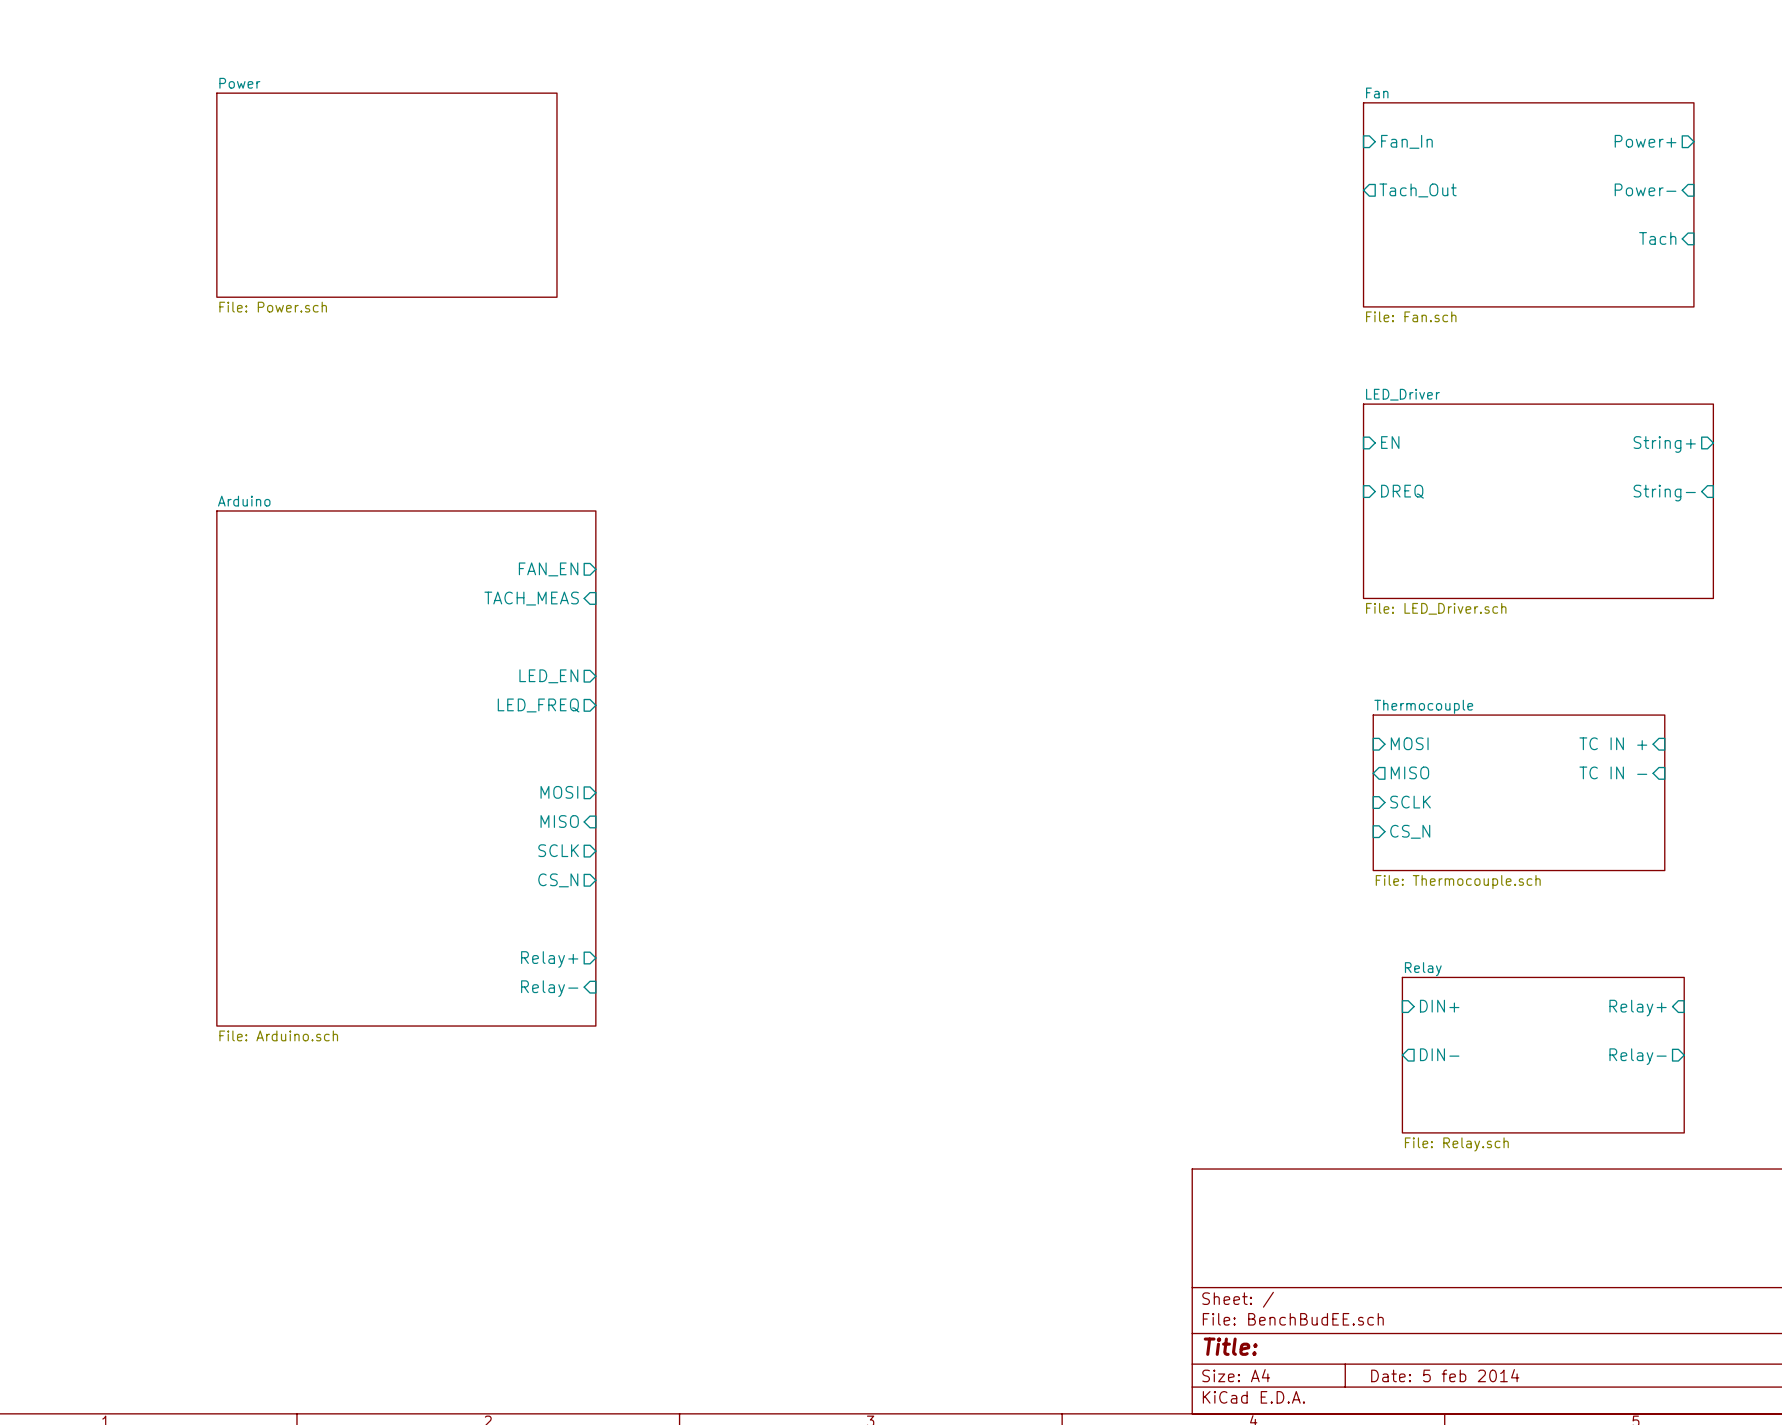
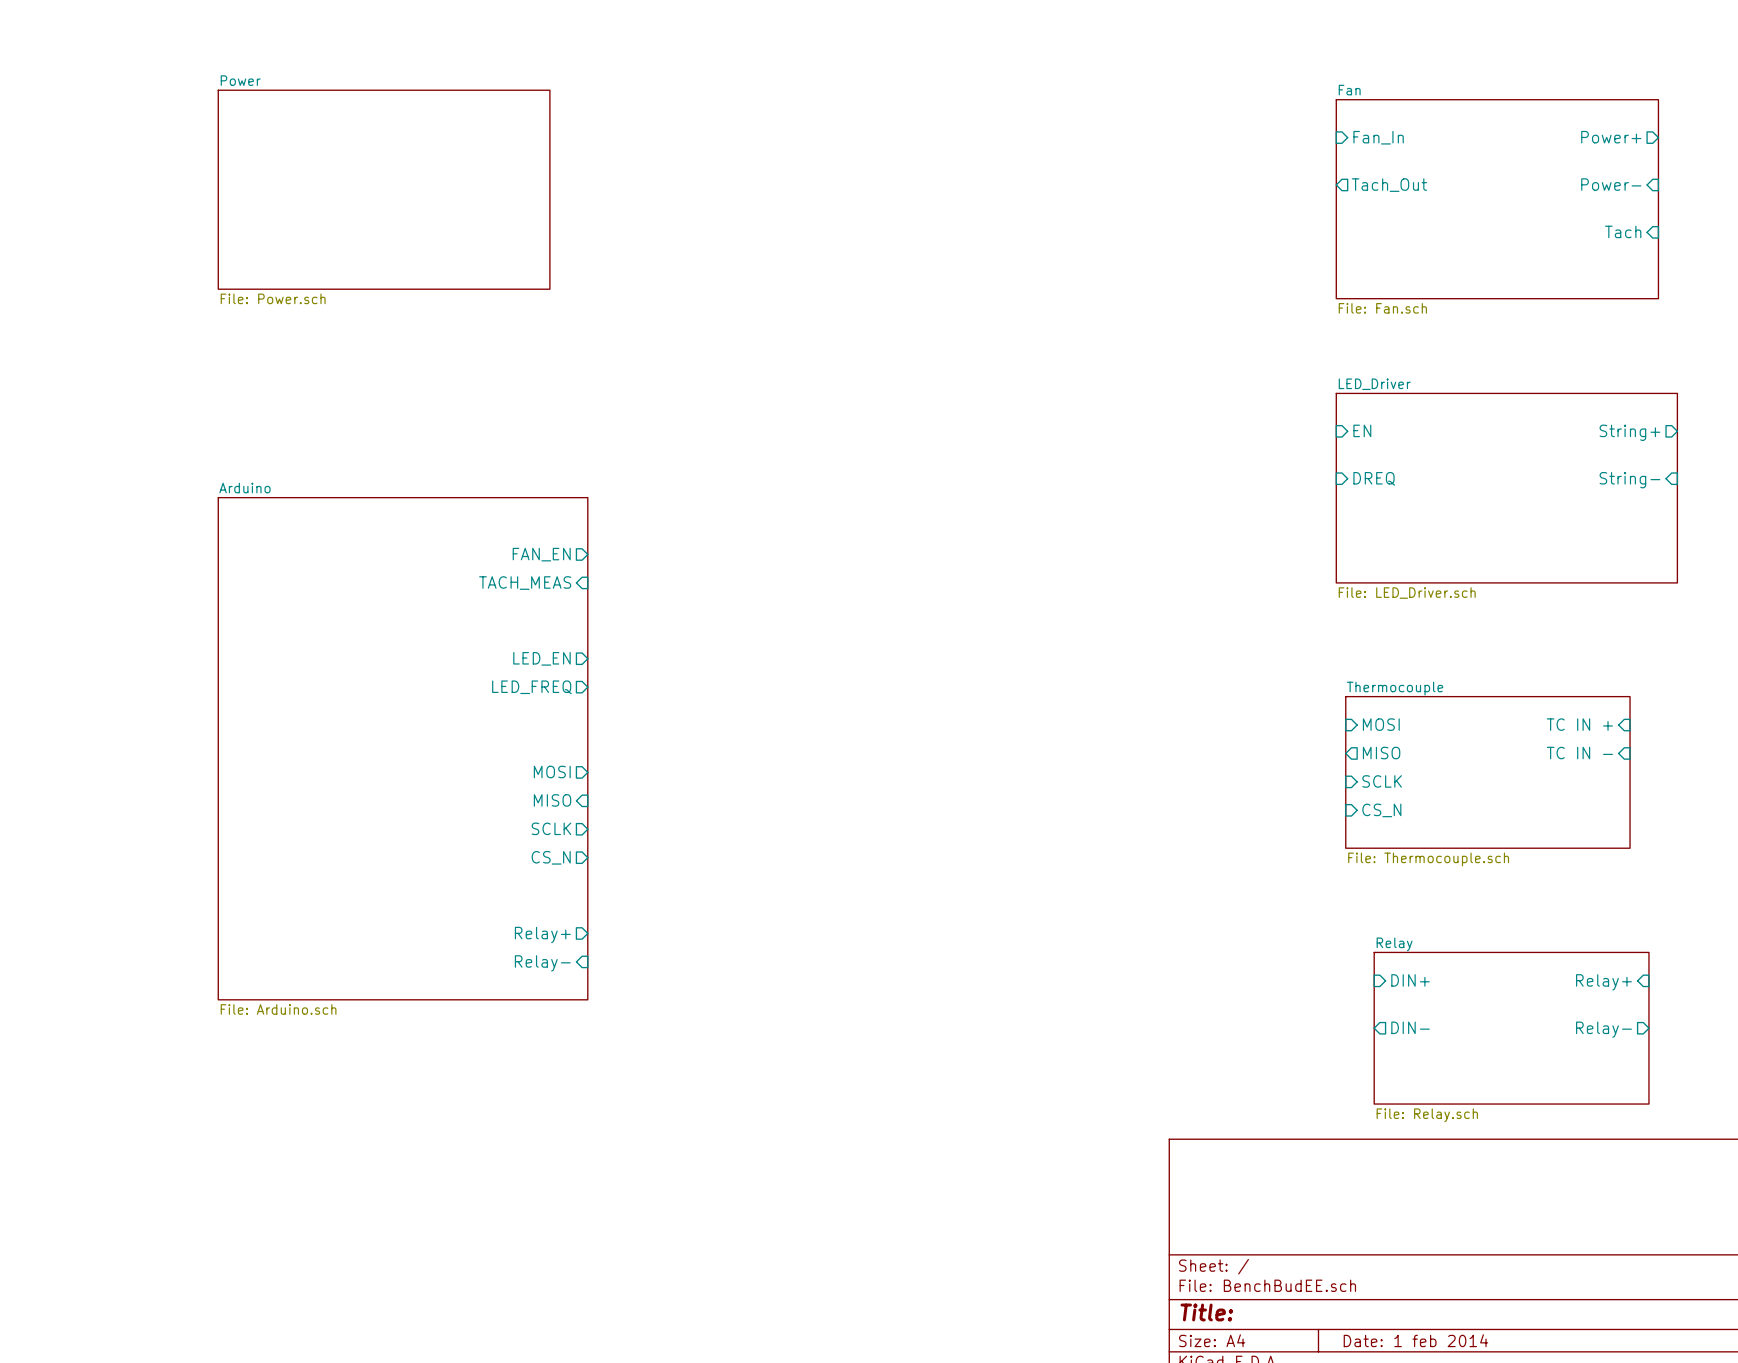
title block: Date: 5 feb 2014 (1445, 1375) -> Date: 1 feb 2014 (1415, 1340)

